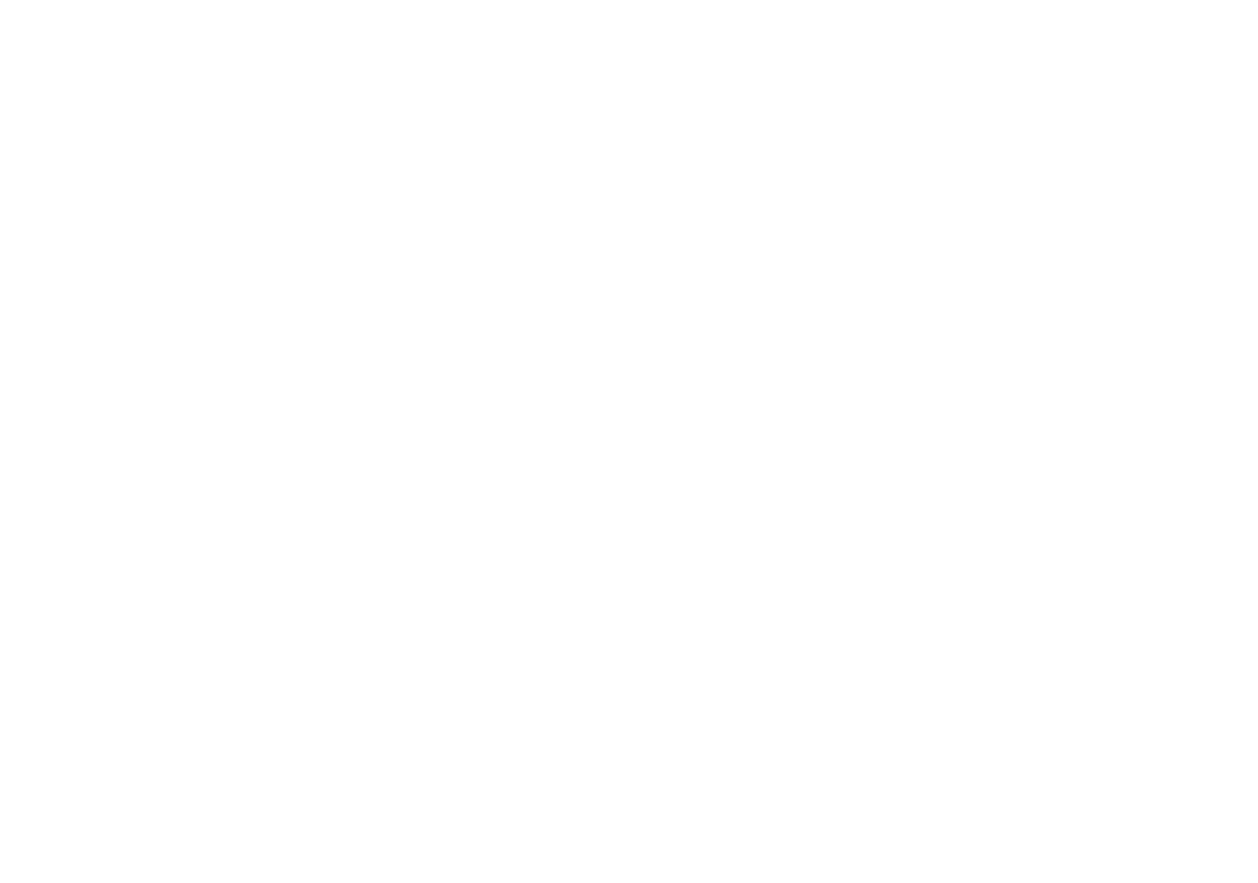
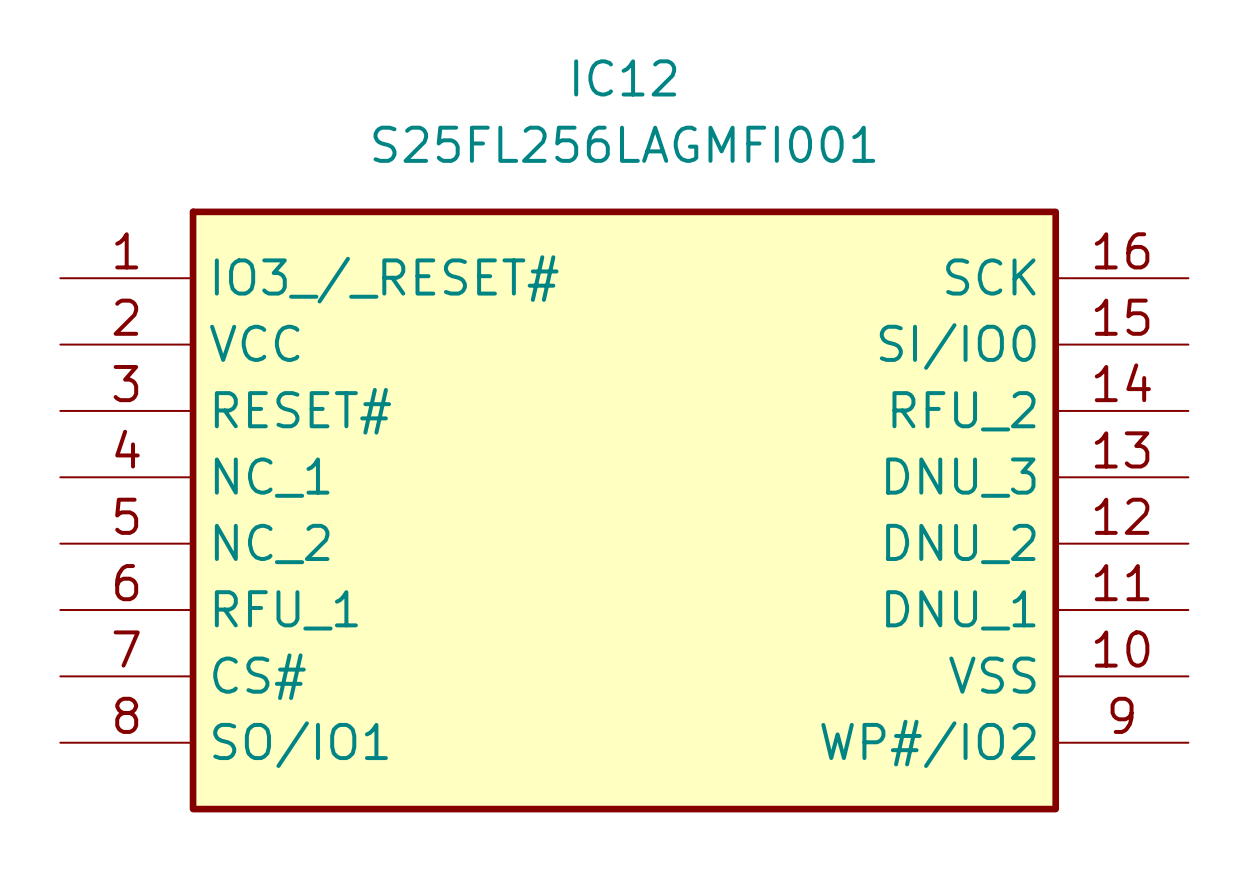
IC12: none -> S25FL256LAGMFI001 (624, 510)

